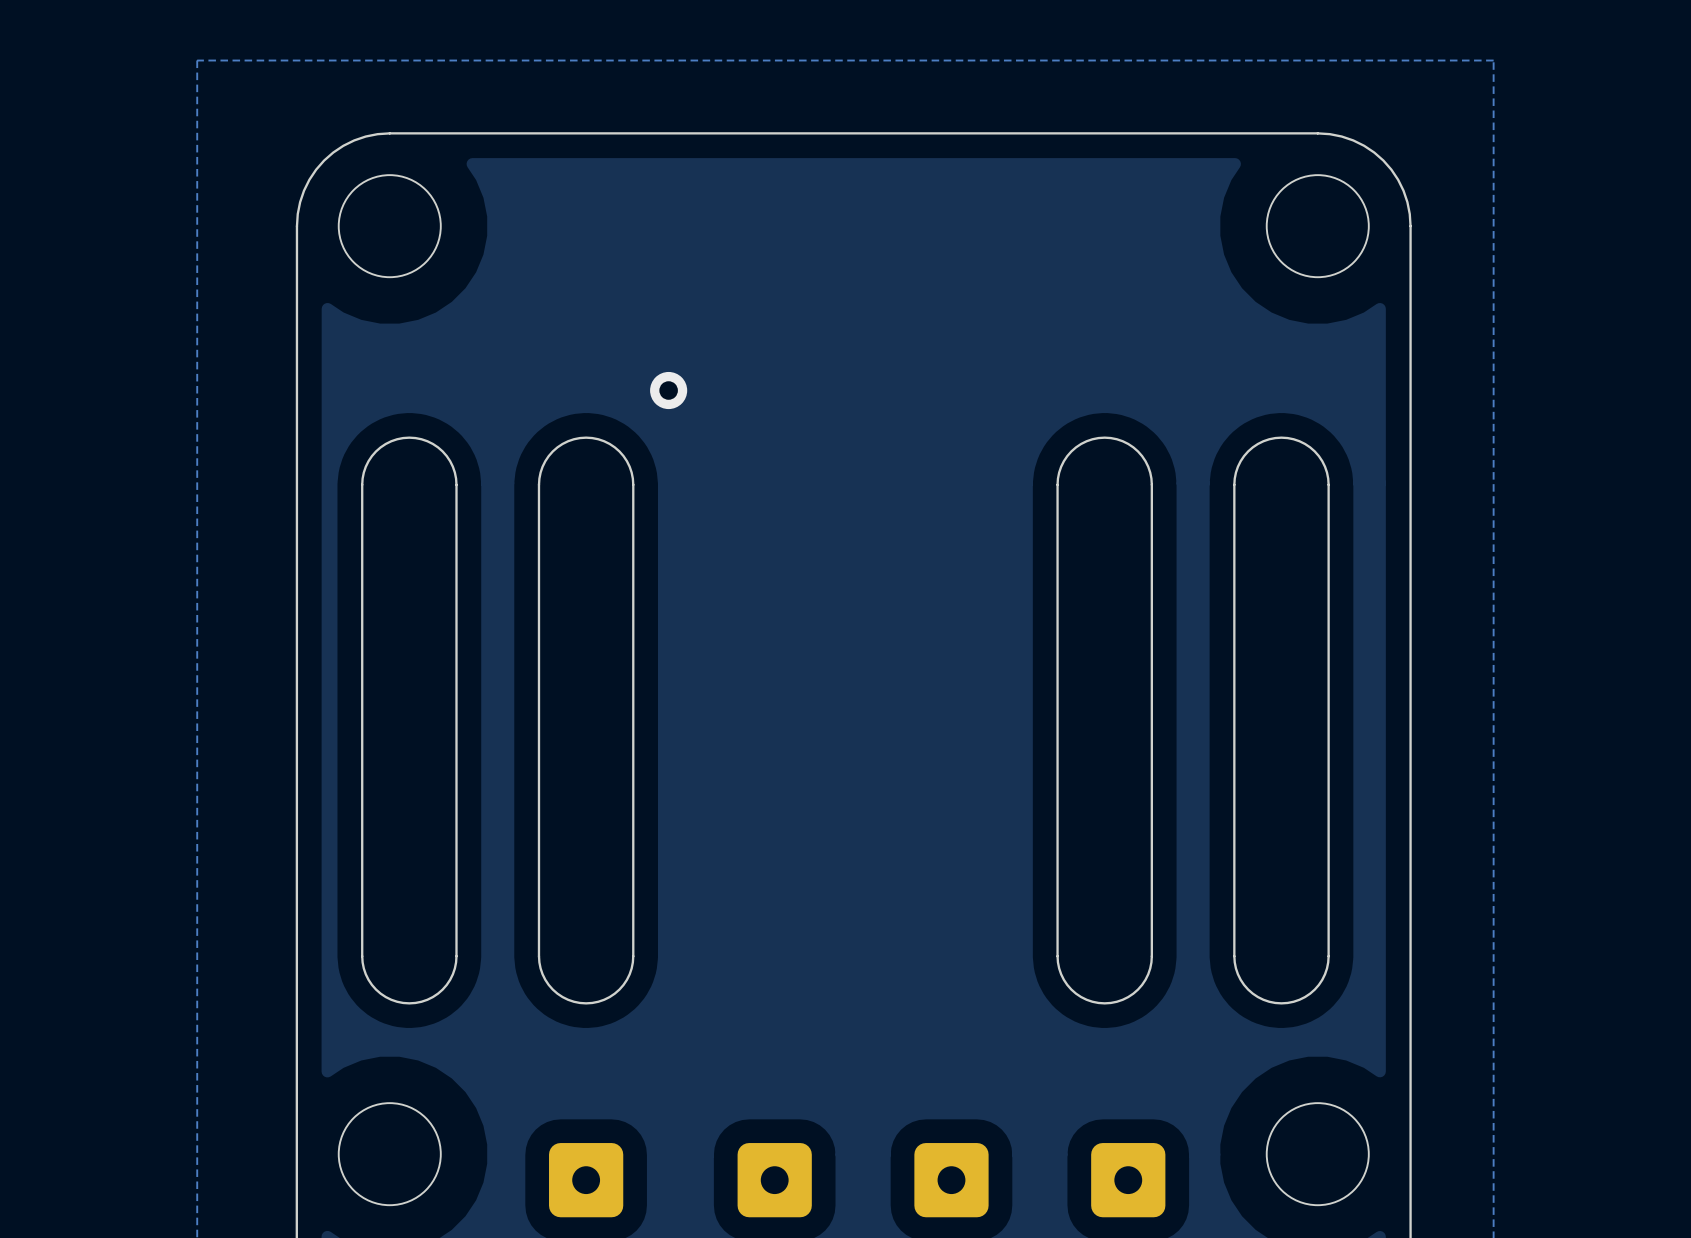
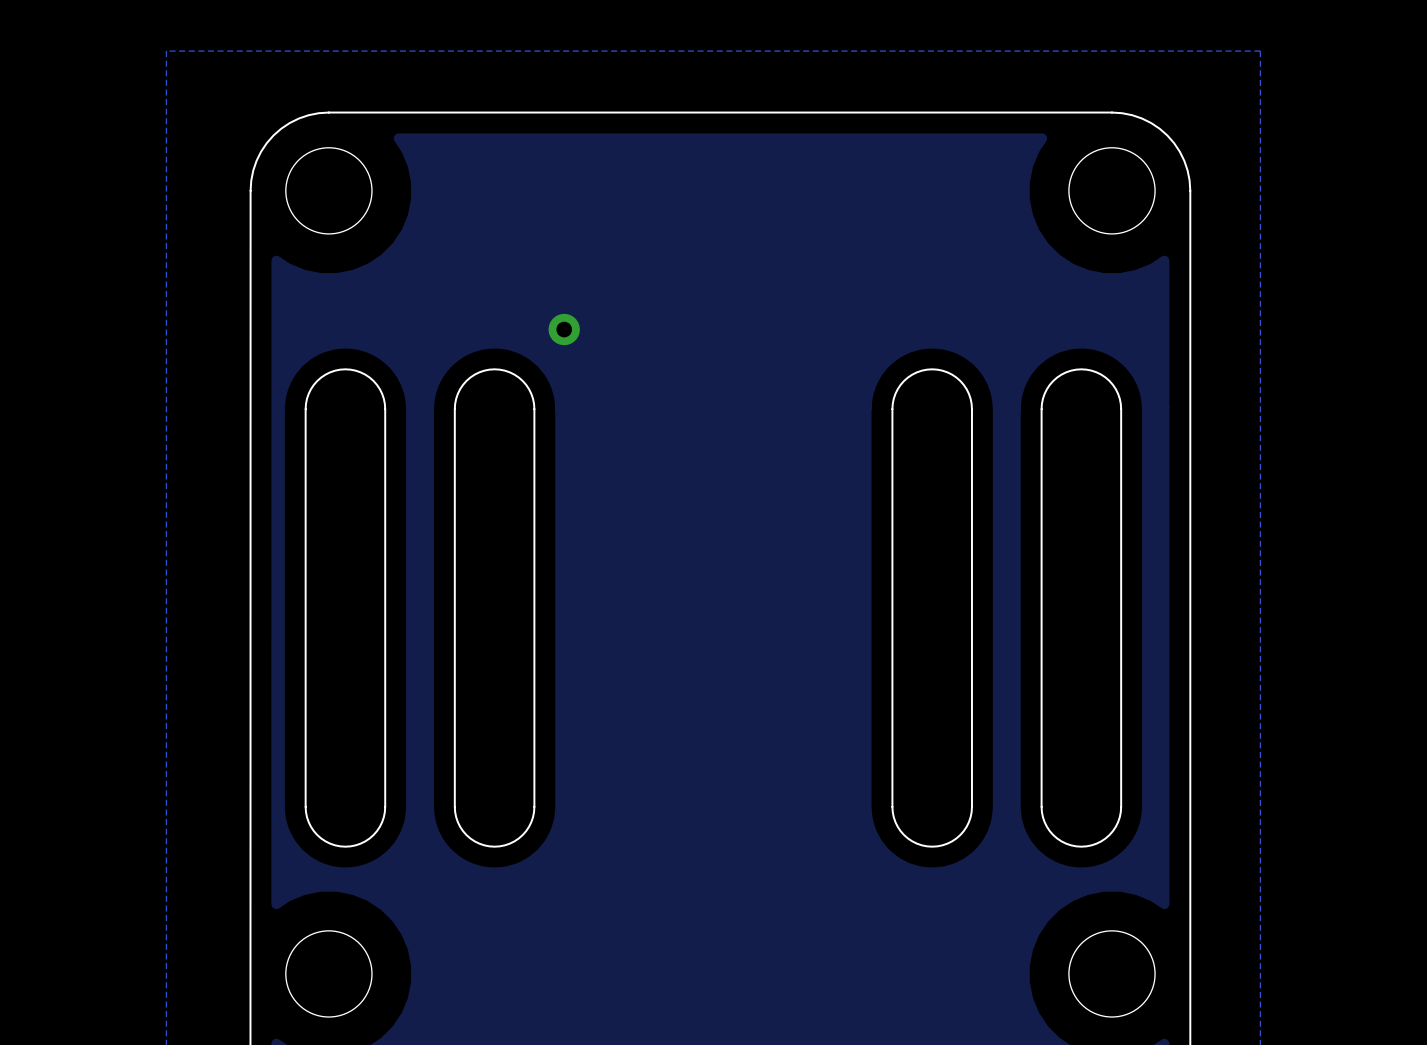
part: (586, 1180) -> none
part: (774, 1180) -> none
part: (951, 1180) -> none
part: (1128, 1180) -> none

